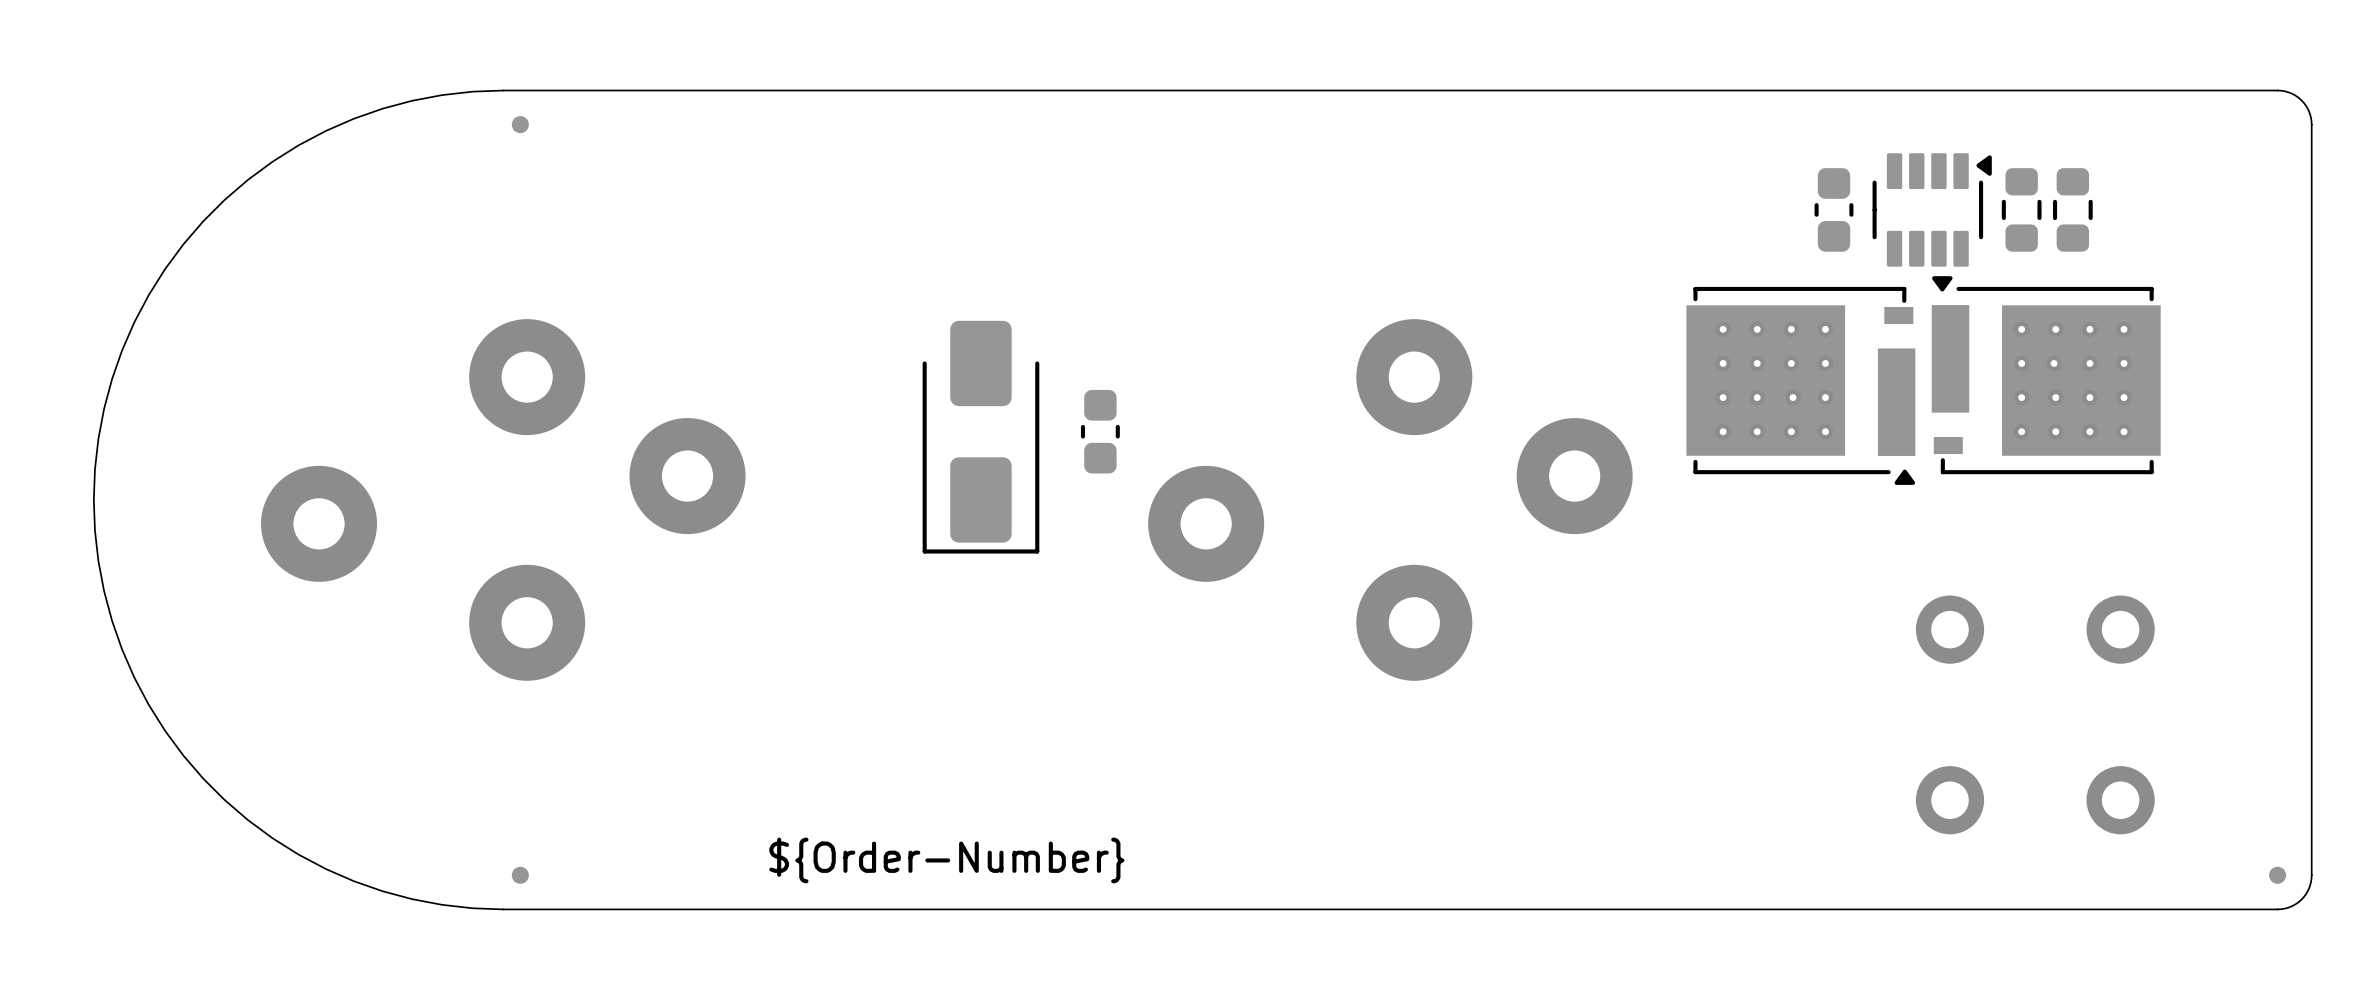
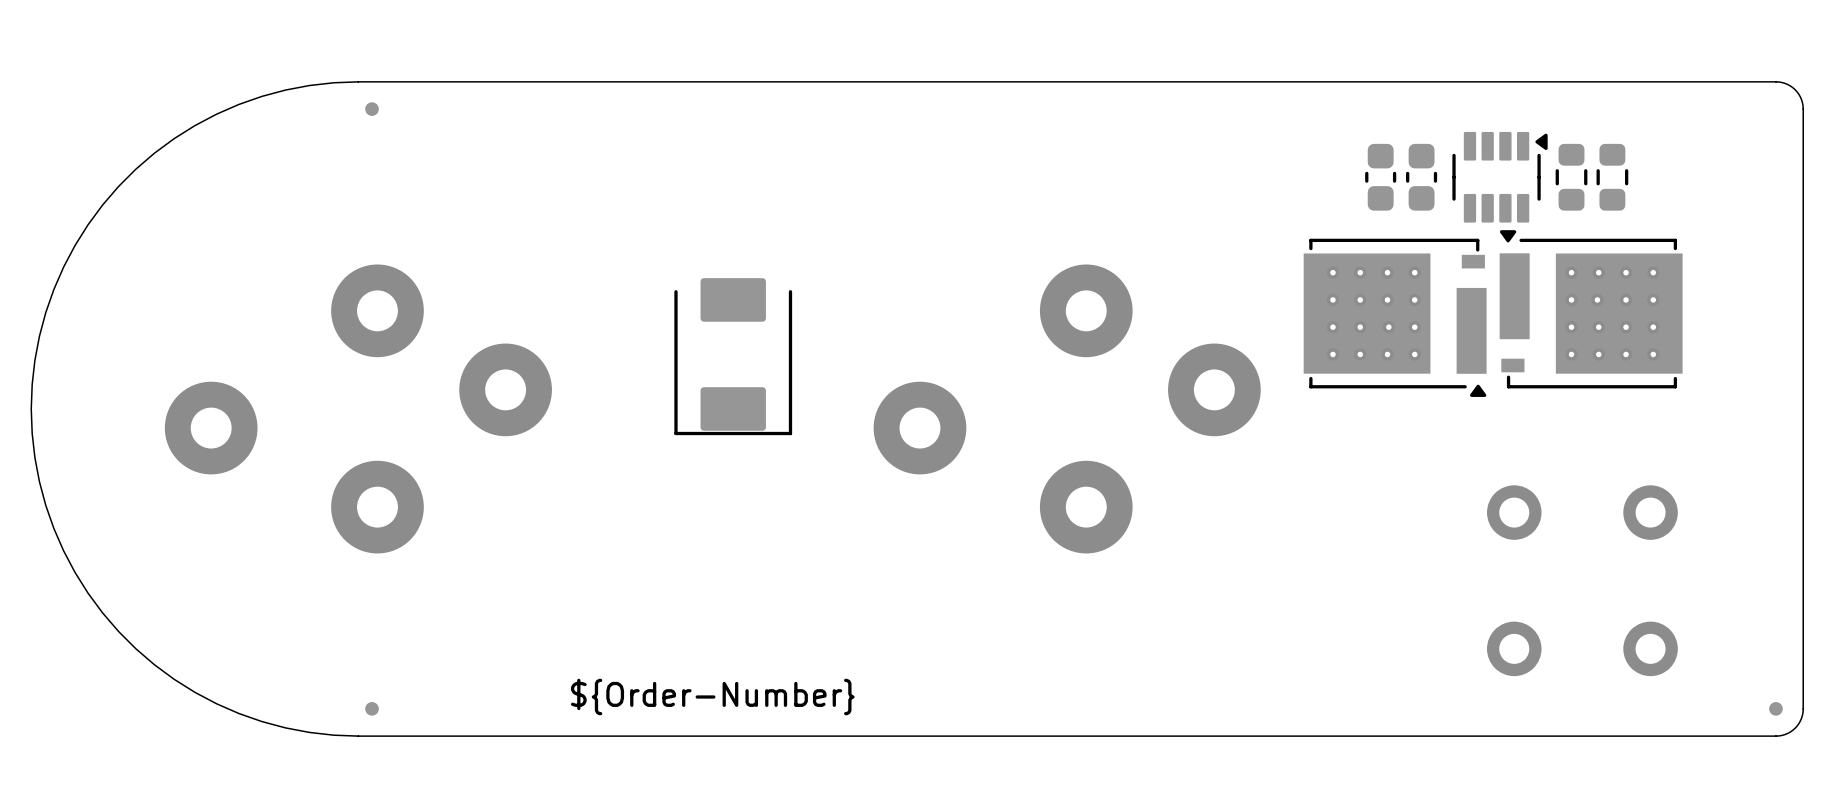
part footprint: [922, 320, 1040, 554] -> [674, 278, 793, 436]
part position: (1100, 431) -> (1380, 177)

